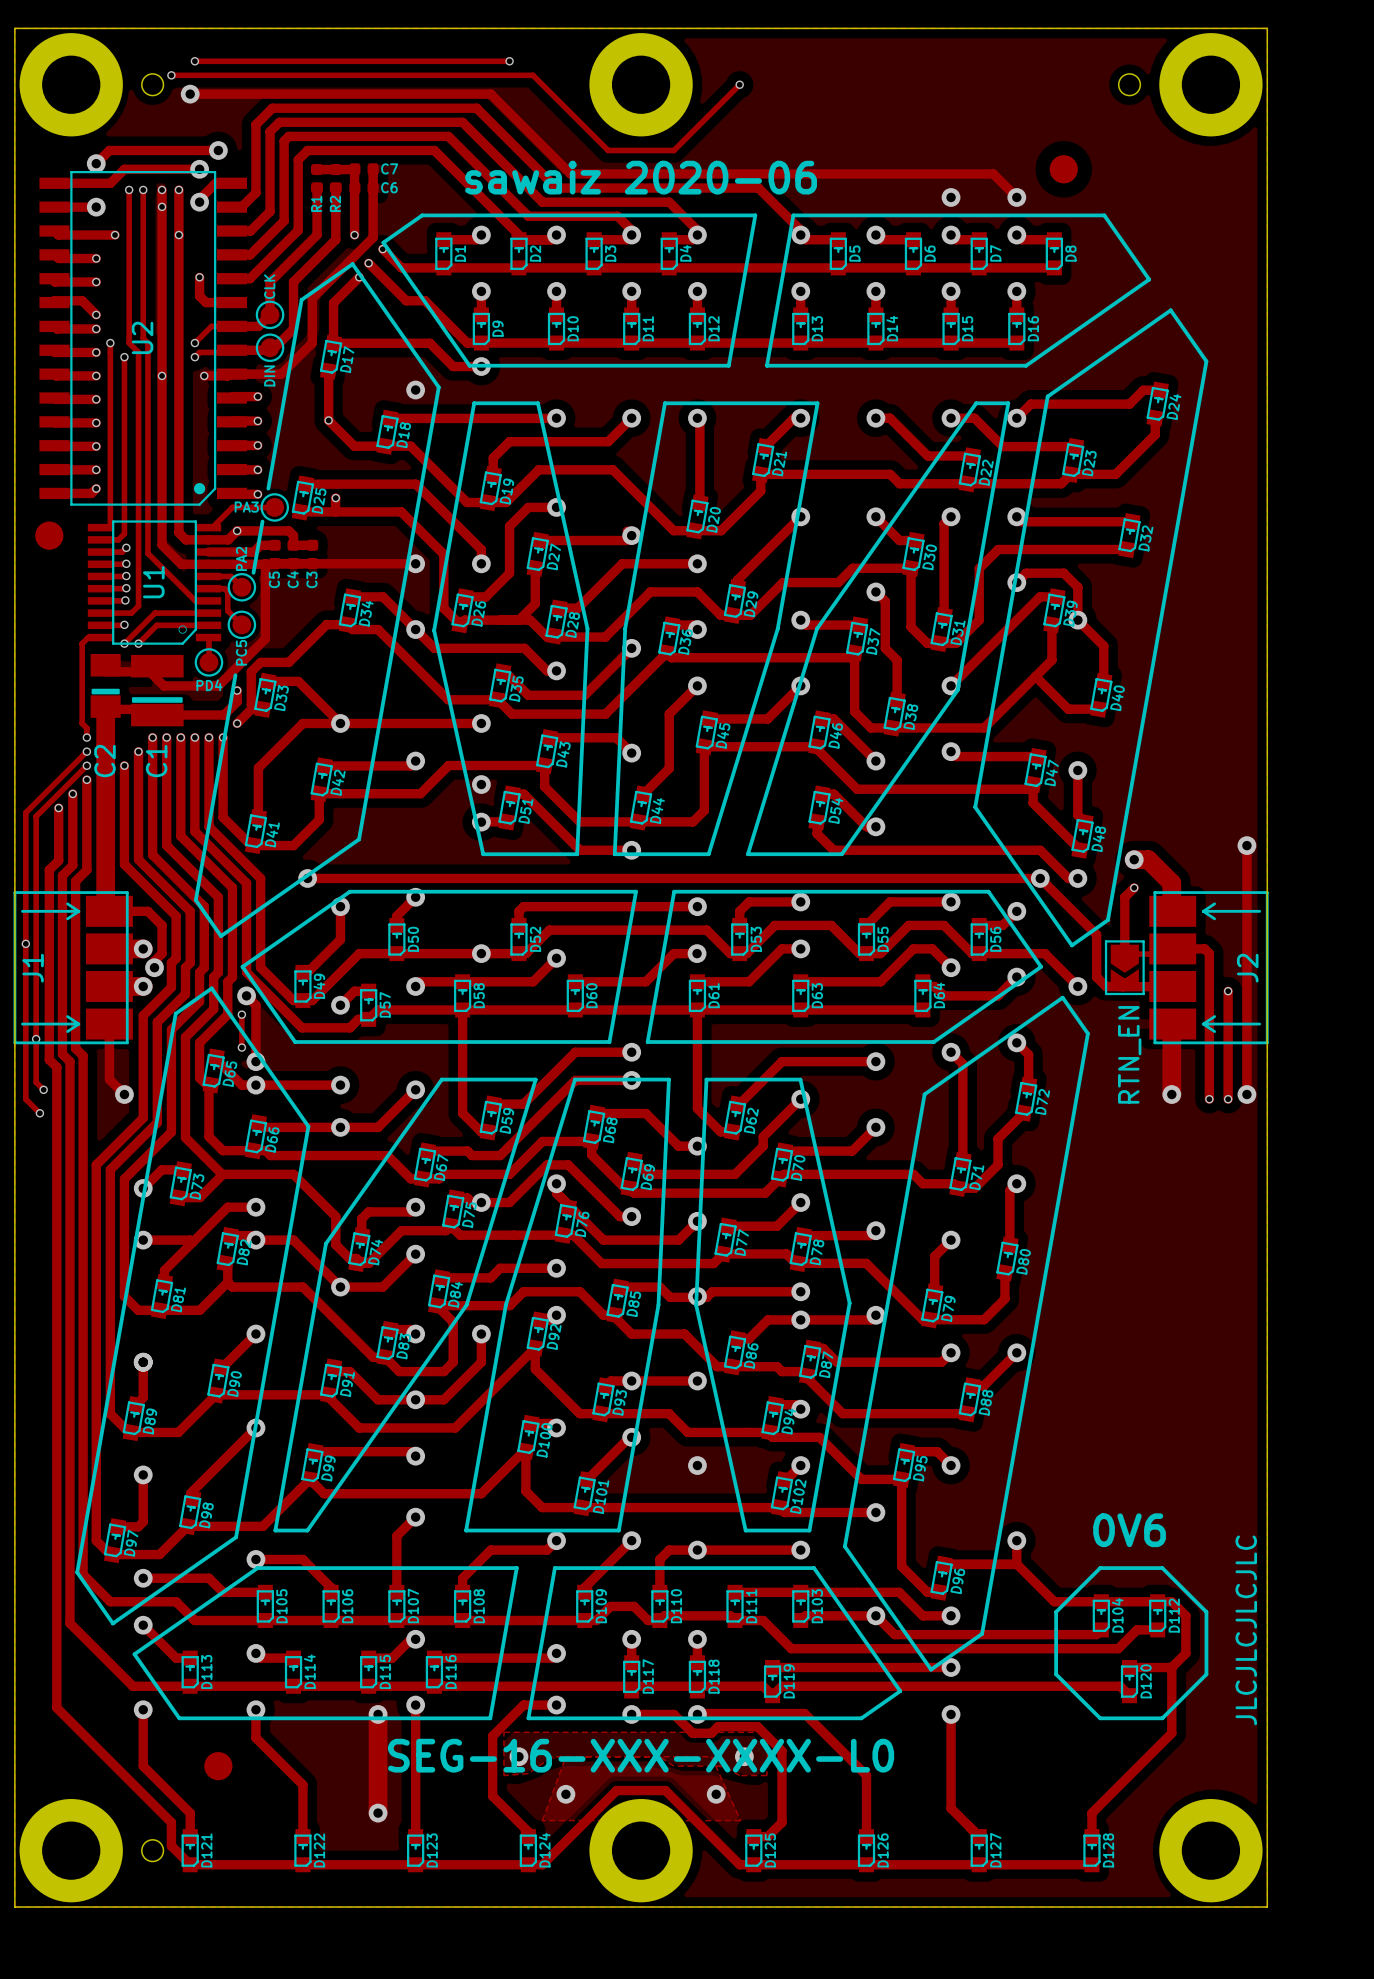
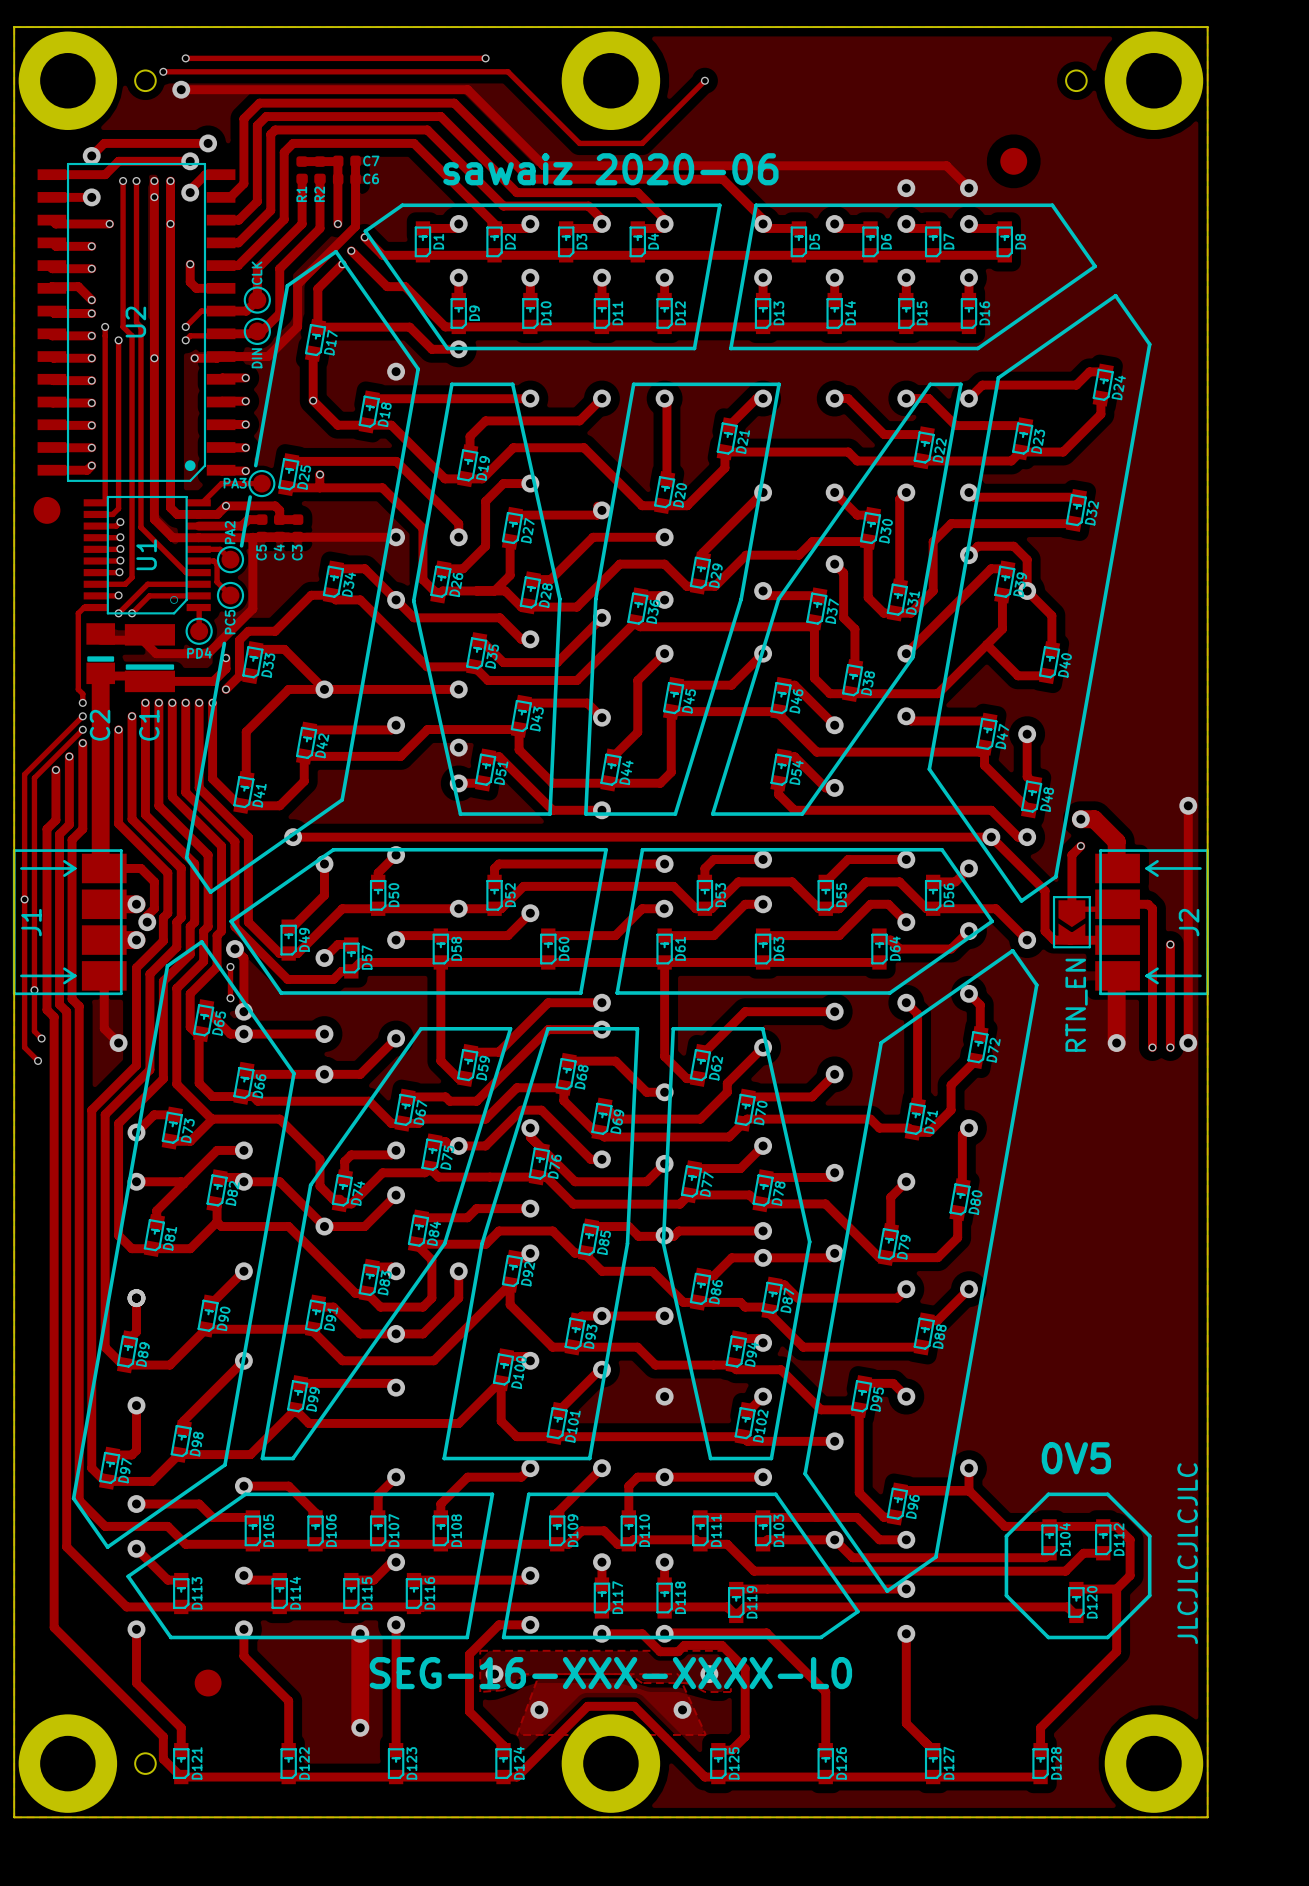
track: (415, 1517) (396, 1535) (396, 1568) -> (396, 1477) (378, 1495)
via position: (415, 1517) -> (396, 1477)
text: 0V6 (1129, 1530) -> 0V5 (1076, 1458)

